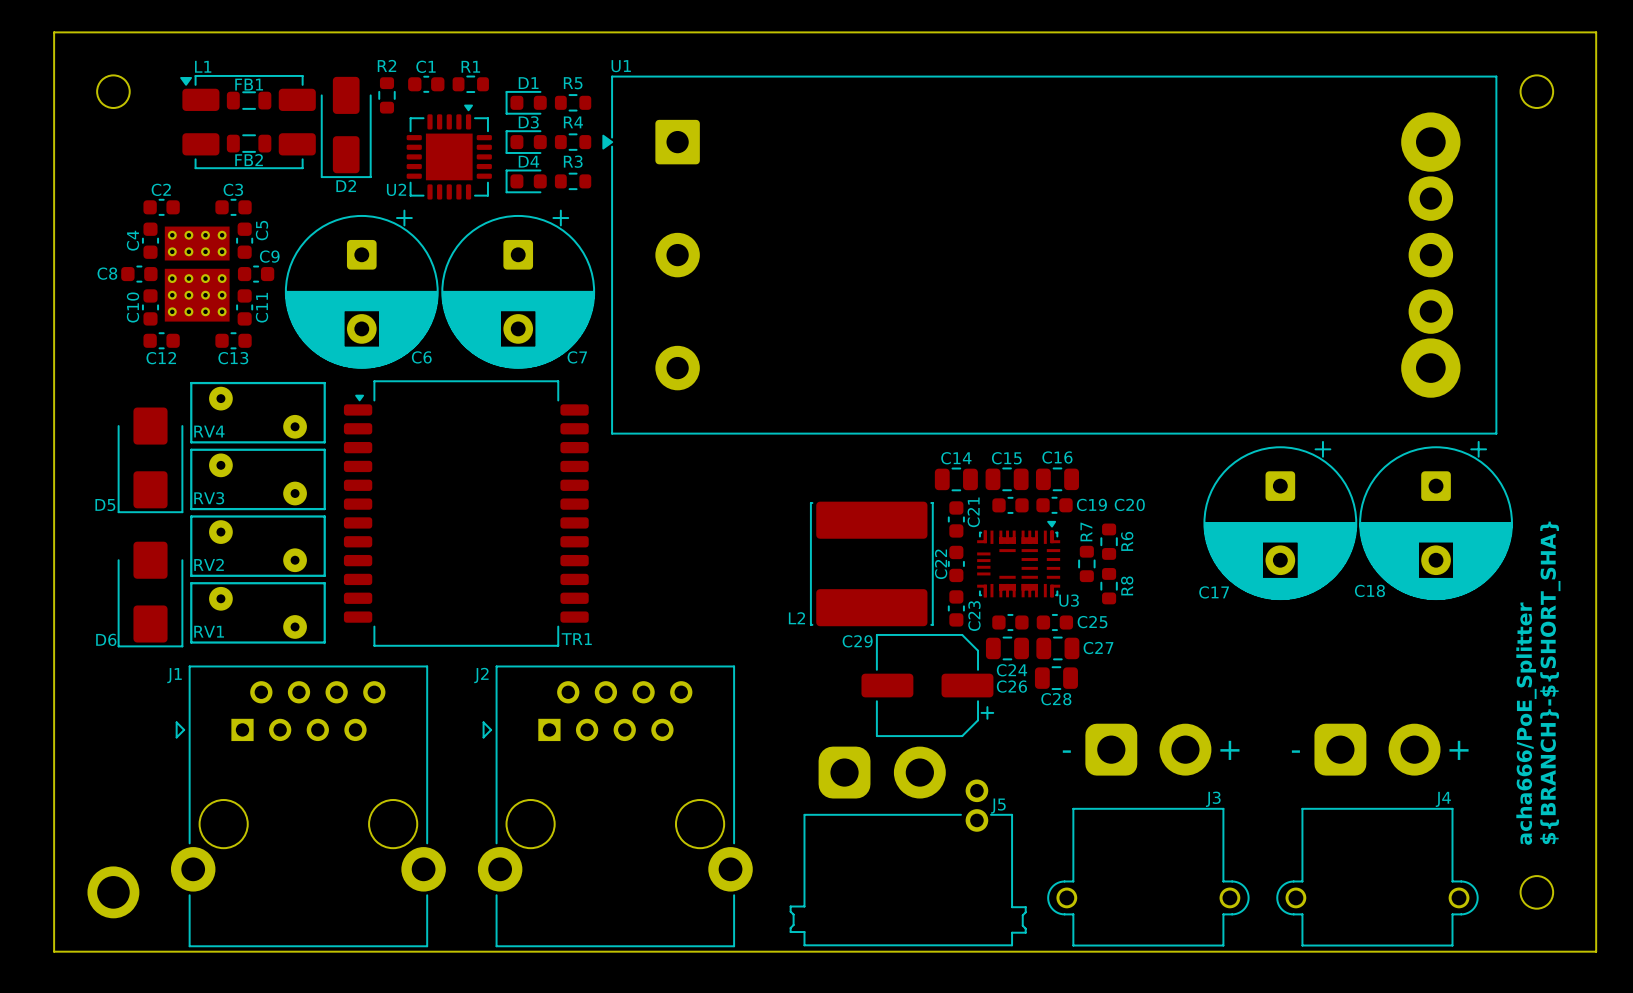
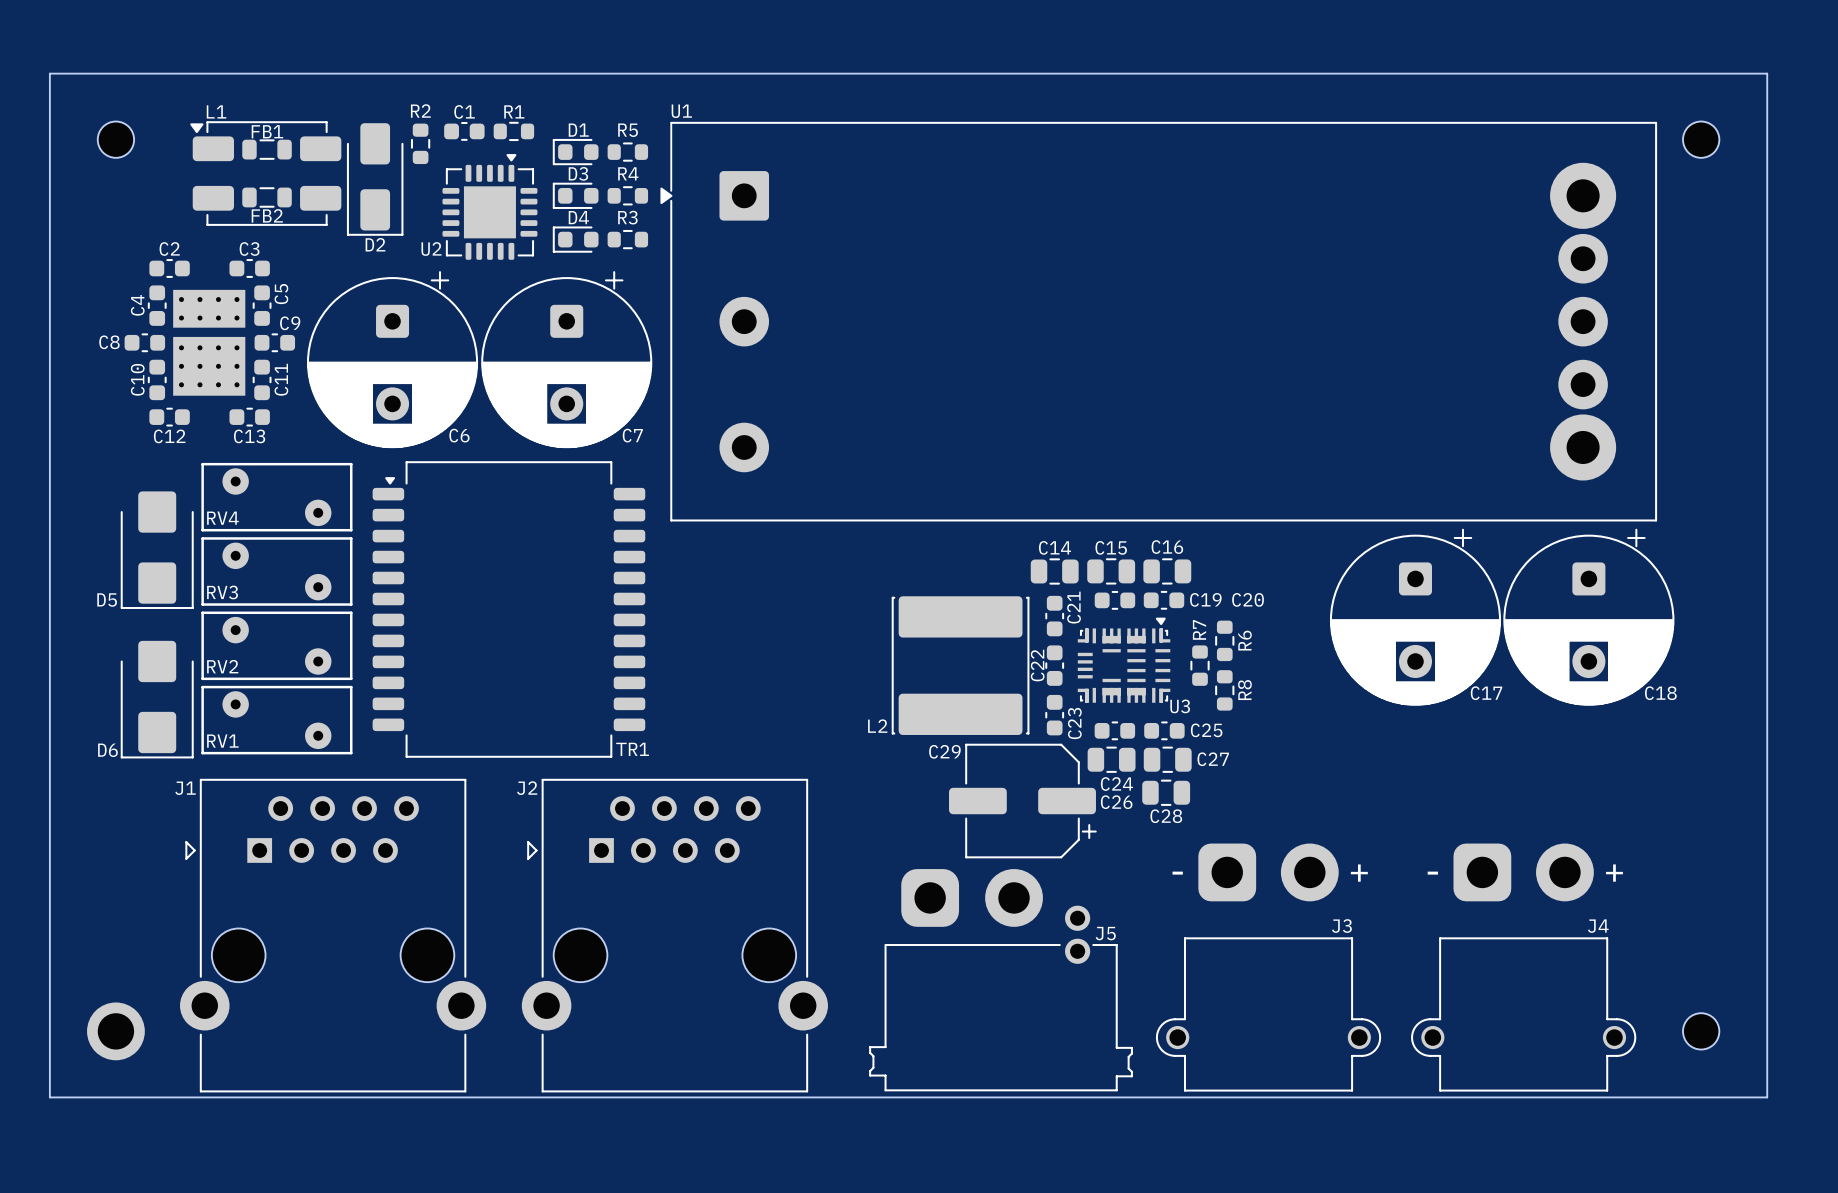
C18 name position: C18 (1369, 590) -> C18 (1660, 693)
C17 name position: C17 (1214, 592) -> C17 (1486, 693)
text: ${BRANCH}-${SHORT_SHA} (1550, 682) -> none
text: acha666/PoE_Splitter (1526, 723) -> none

